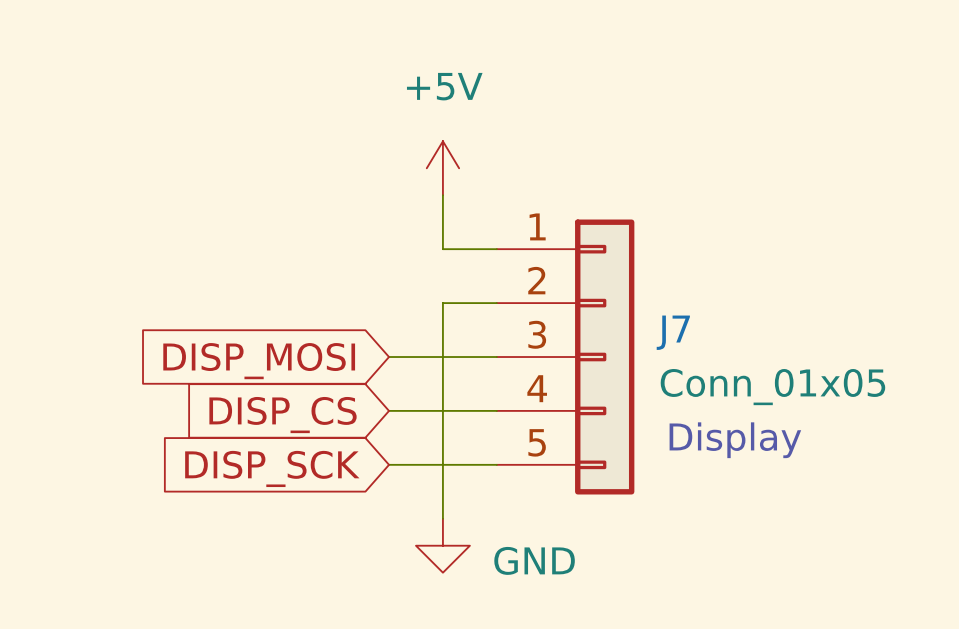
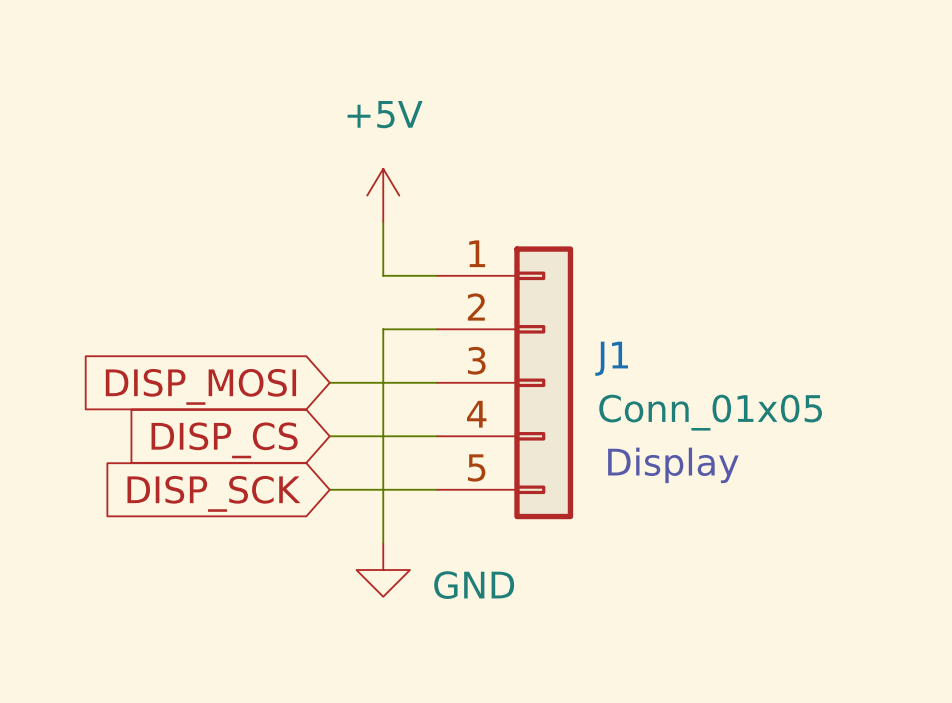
J7 name: J7 (673, 332) -> J1 (611, 358)

